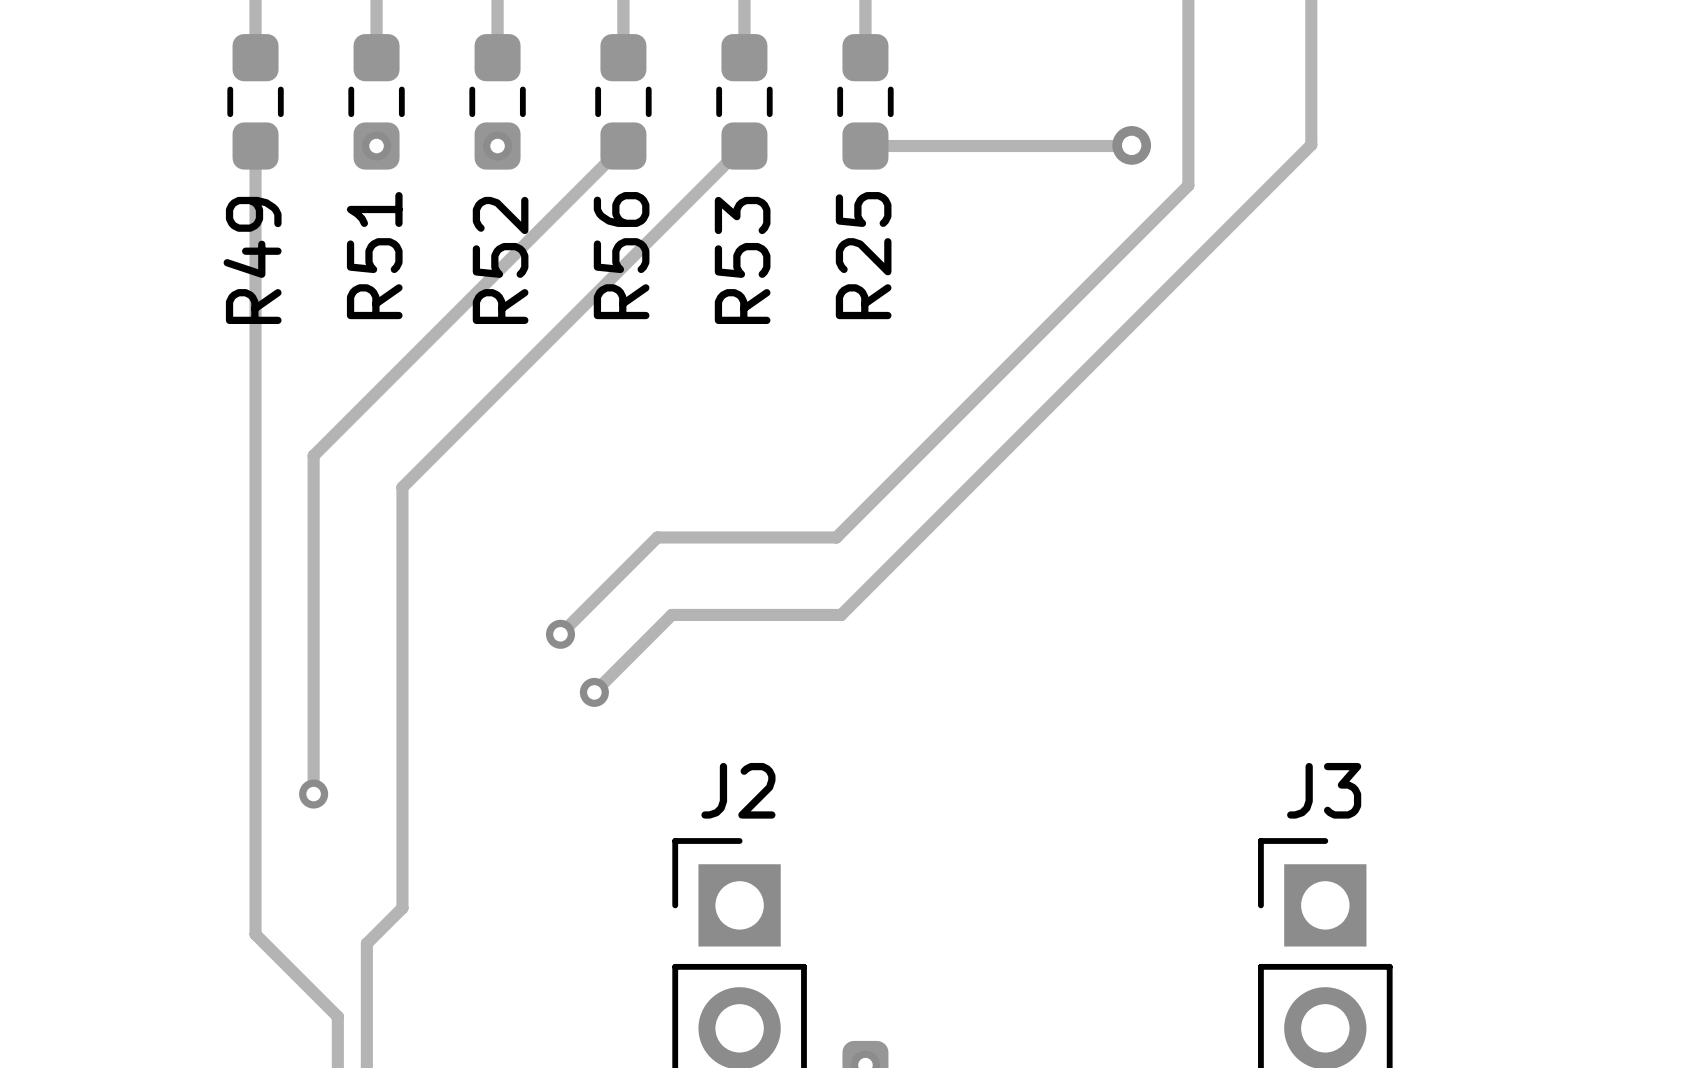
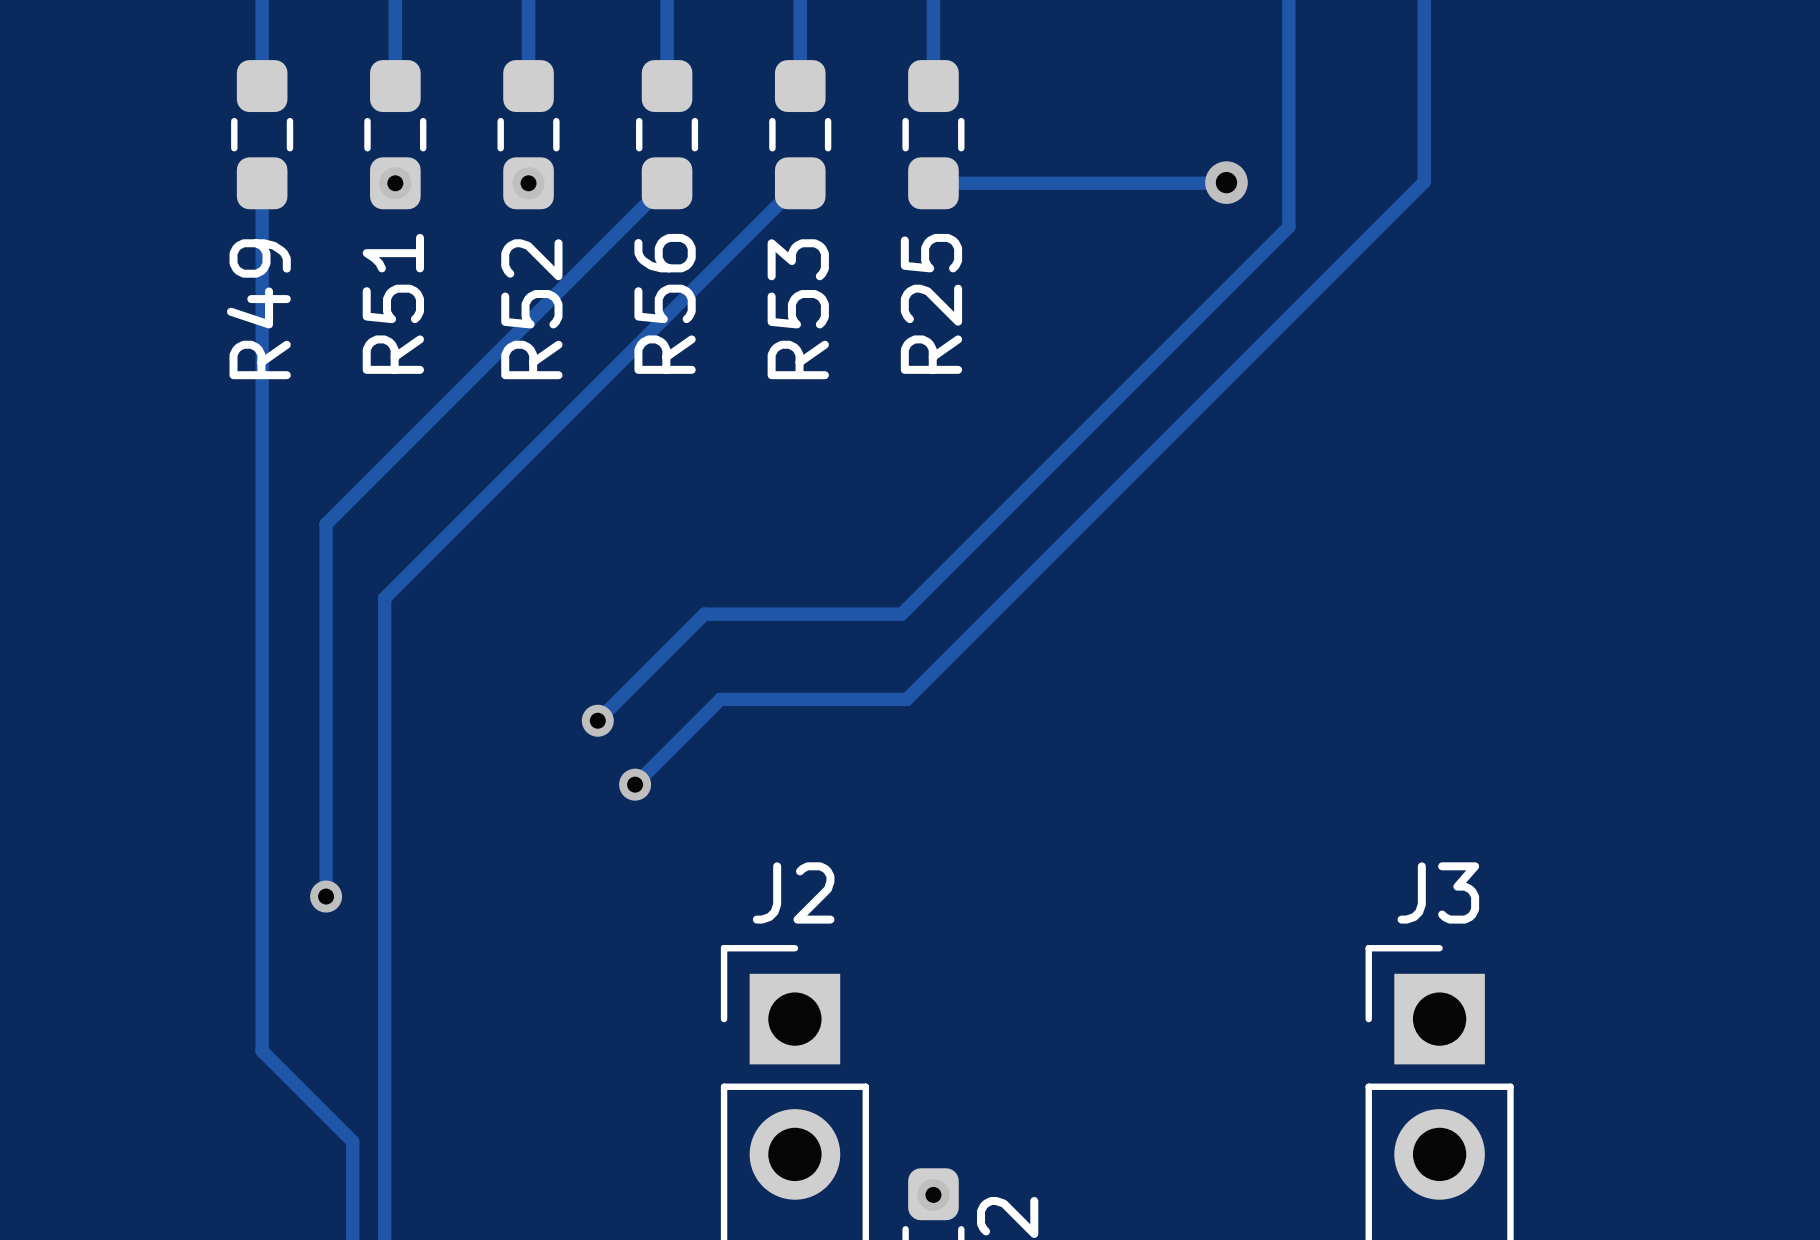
track: (402, 487) (402, 908) (366, 943) -> (423, 559) (384, 598) (384, 1061)

